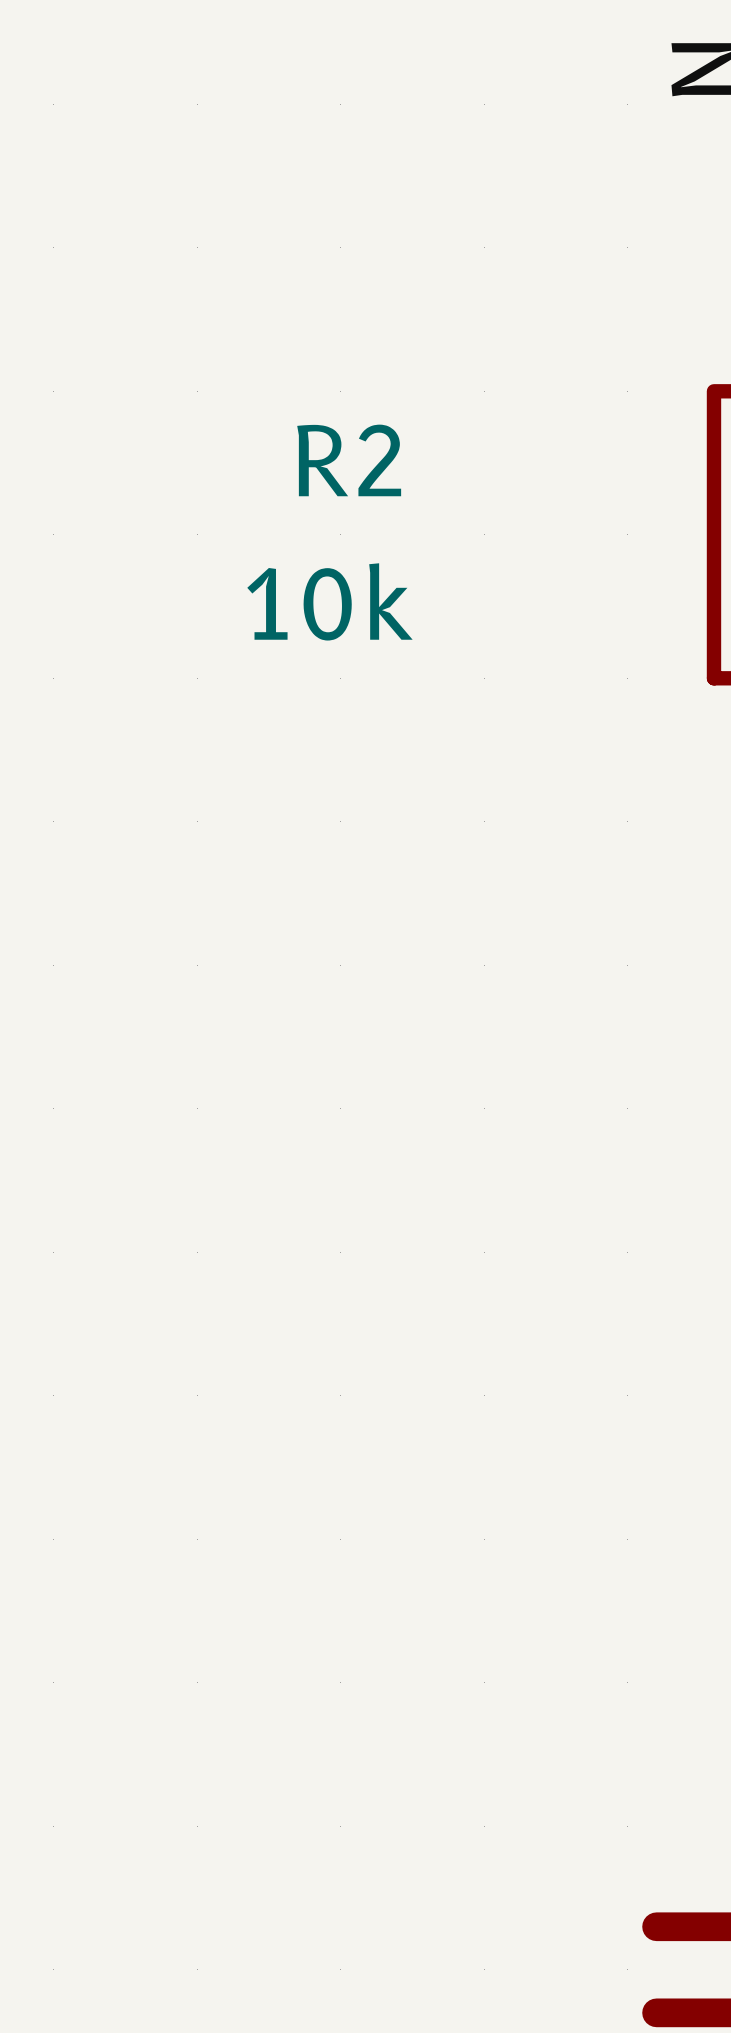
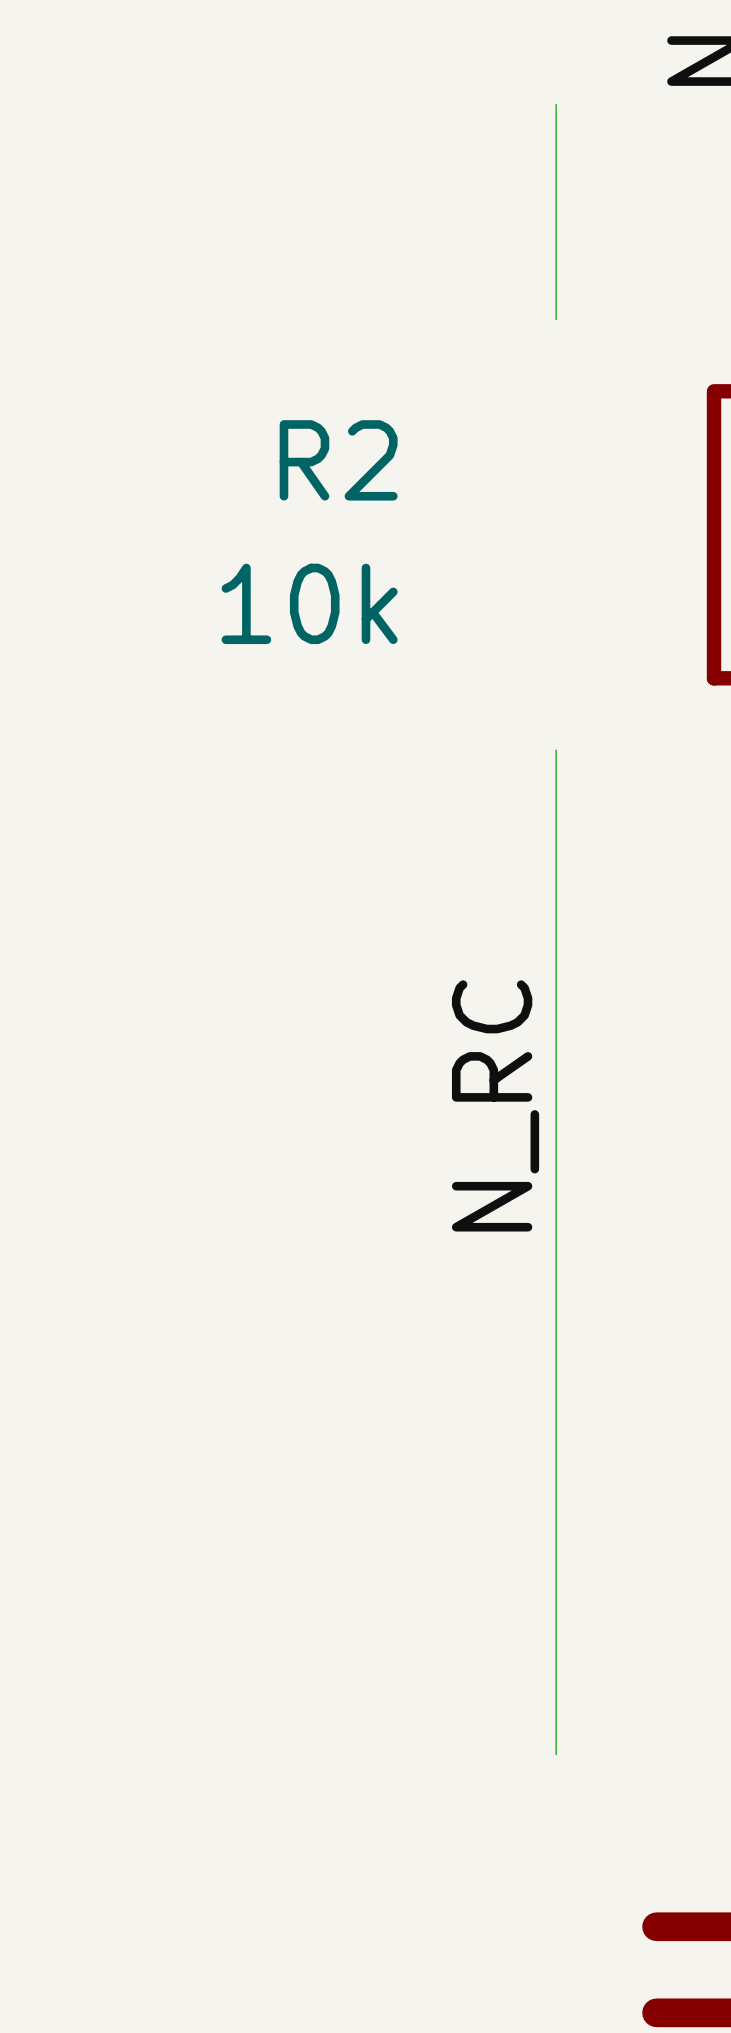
wire: none -> (556, 104) (556, 319)
wire: none -> (556, 750) (556, 1754)
label: none -> N_RC (495, 1105)

